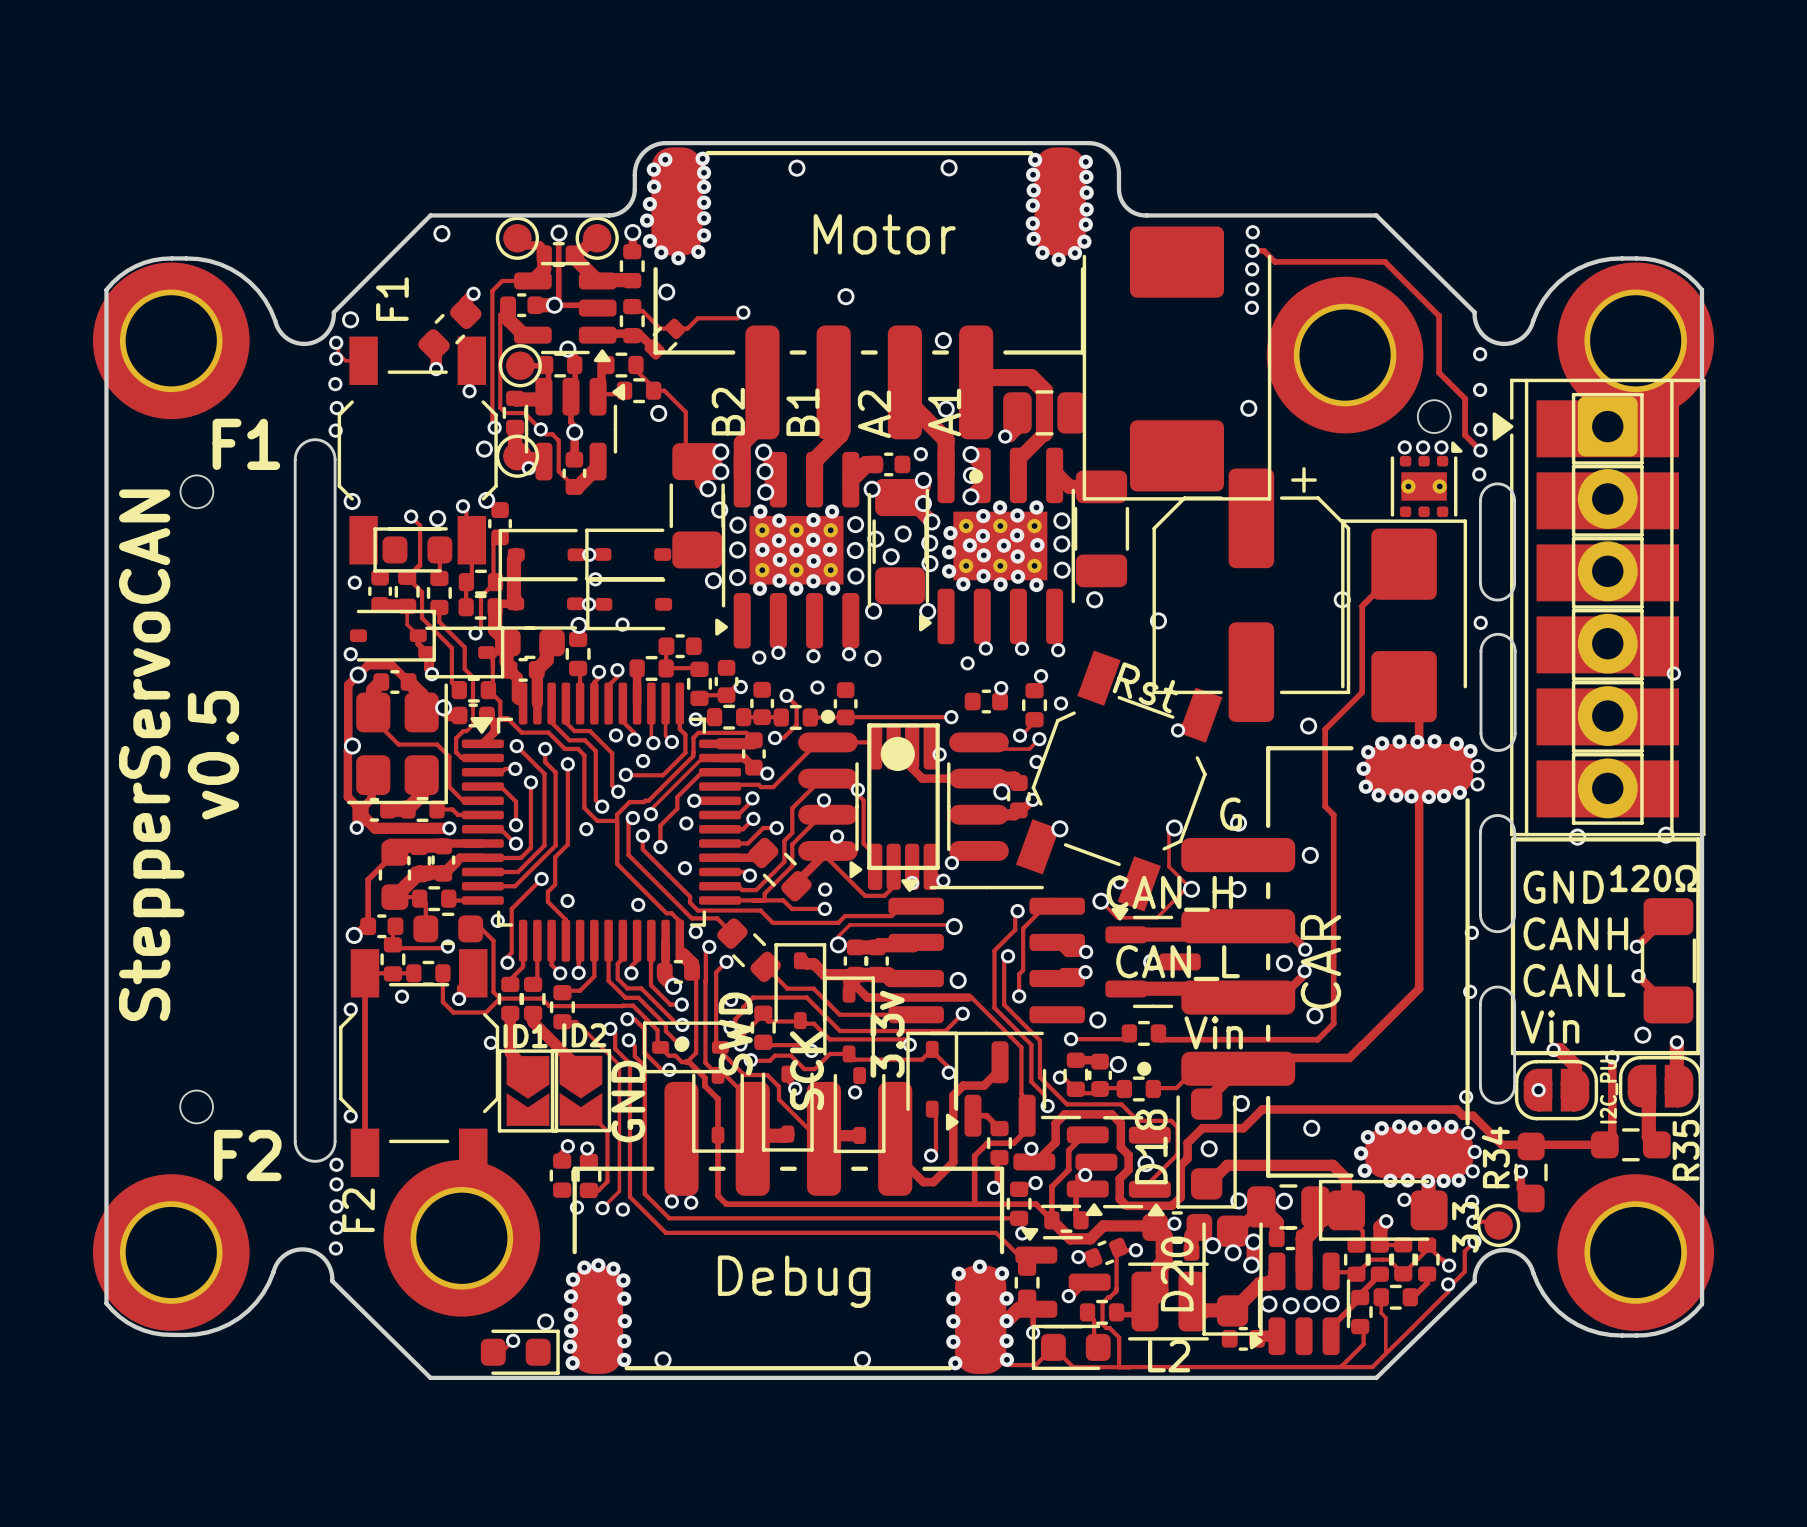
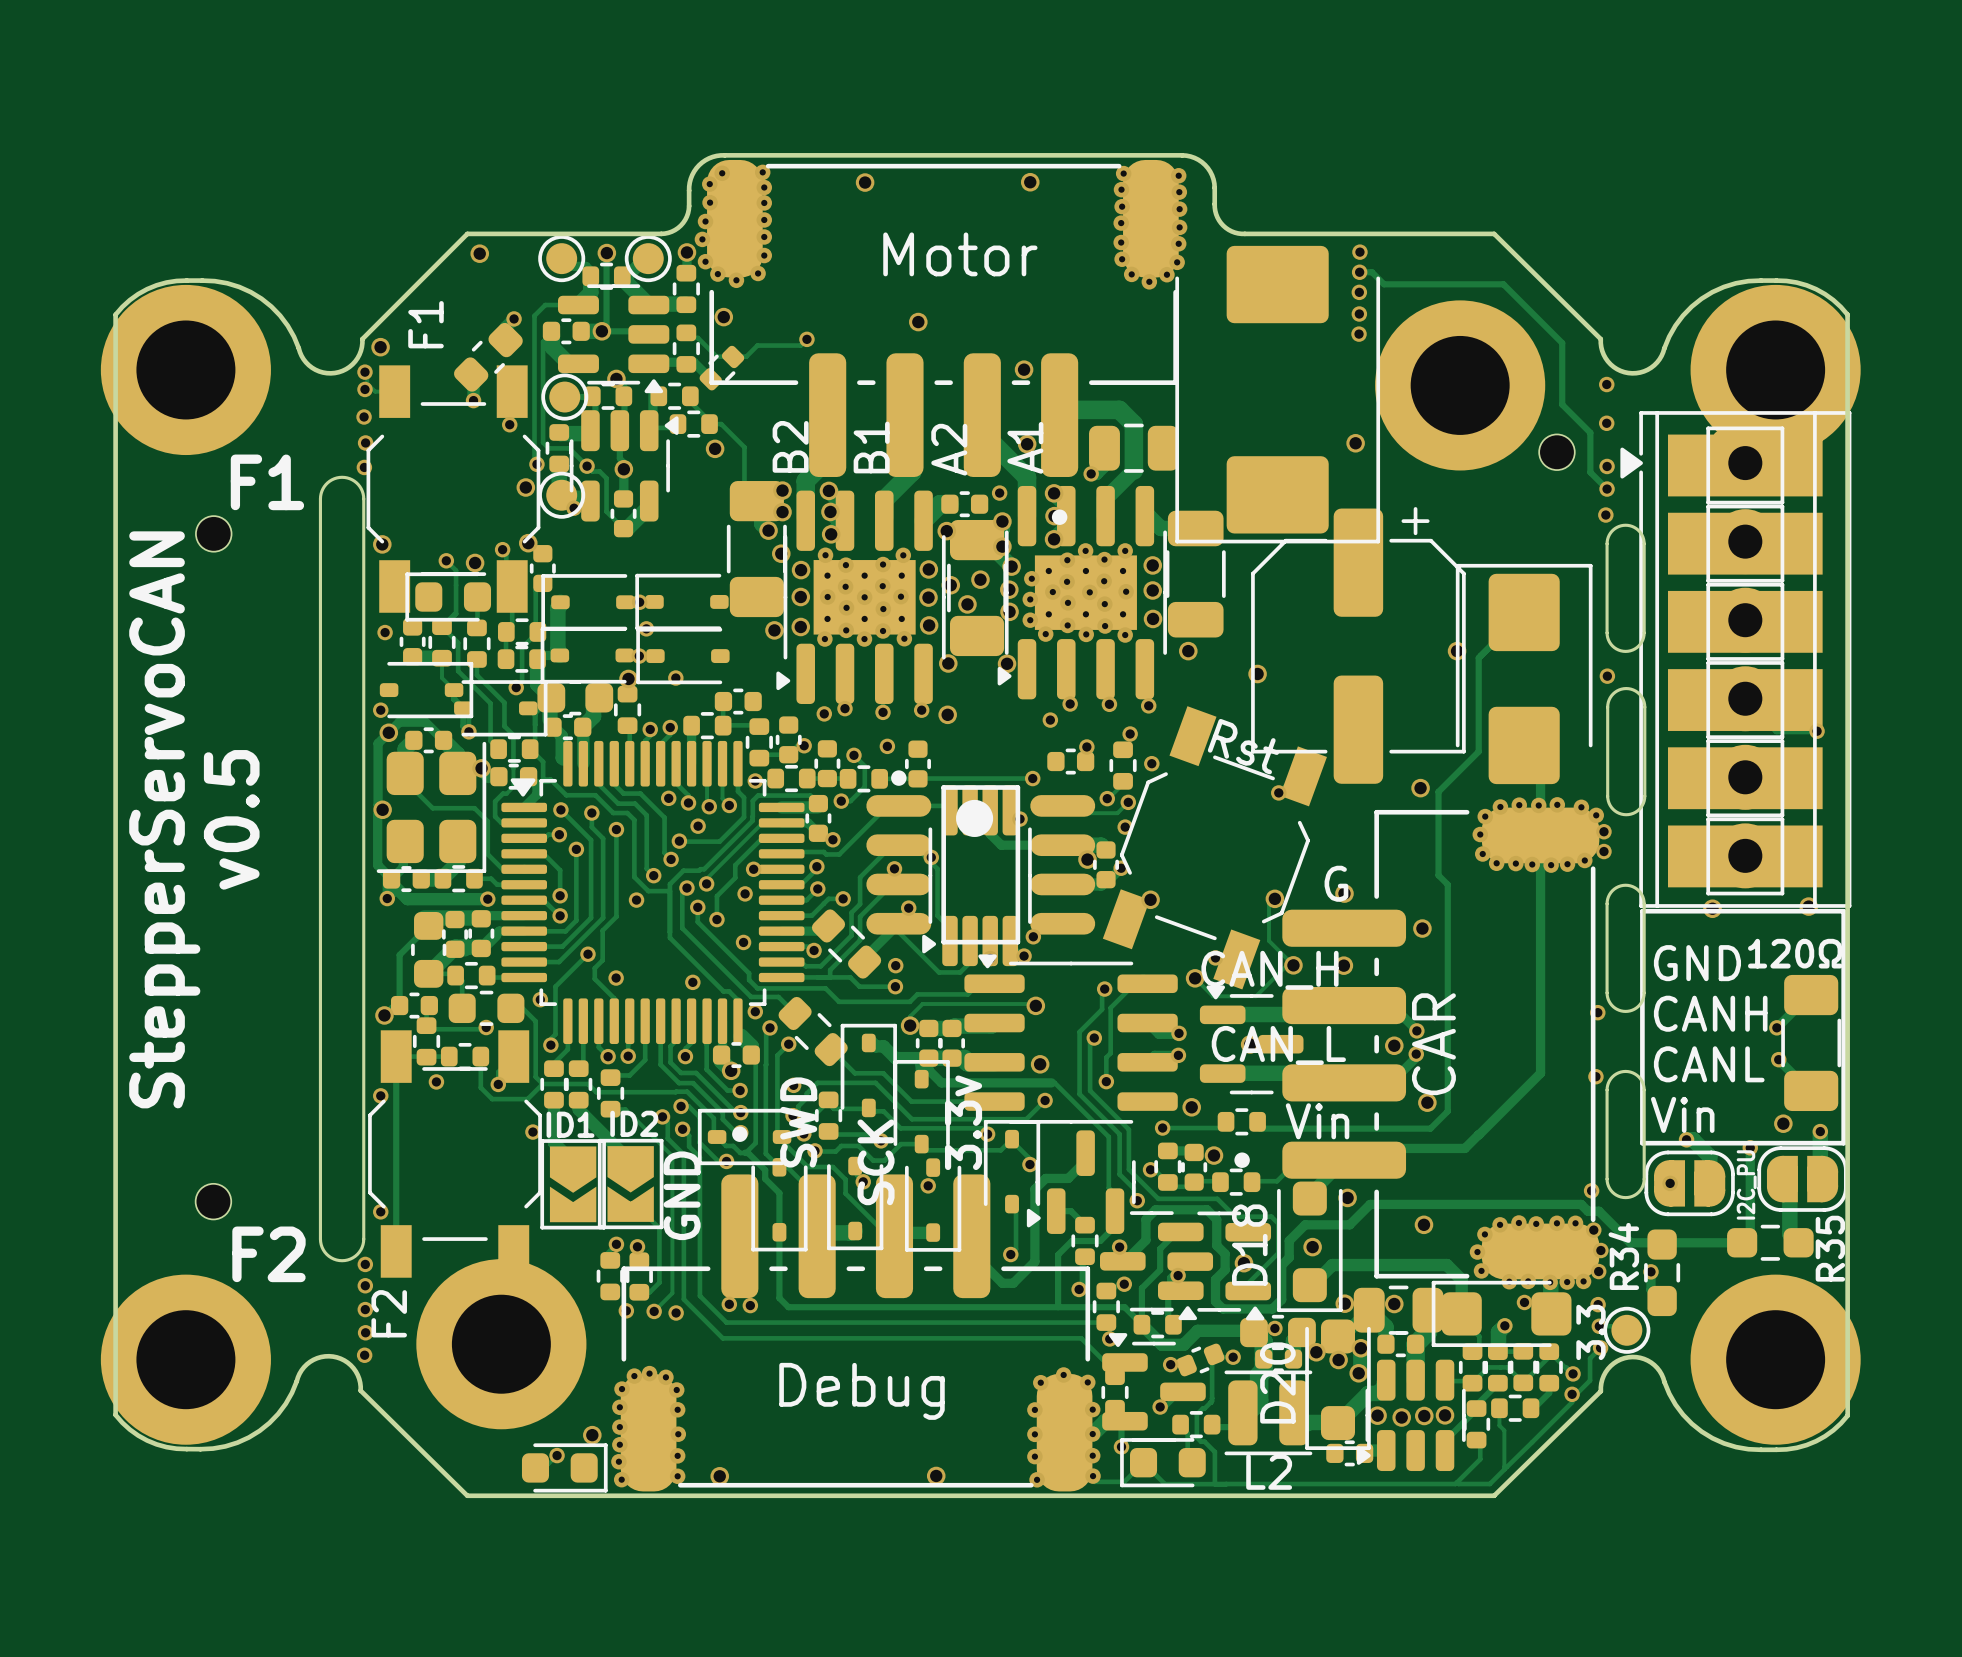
via: (1404, 447) -> none
via: (1423, 447) -> none
via: (1441, 447) -> none
part: (1426, 479) -> none

